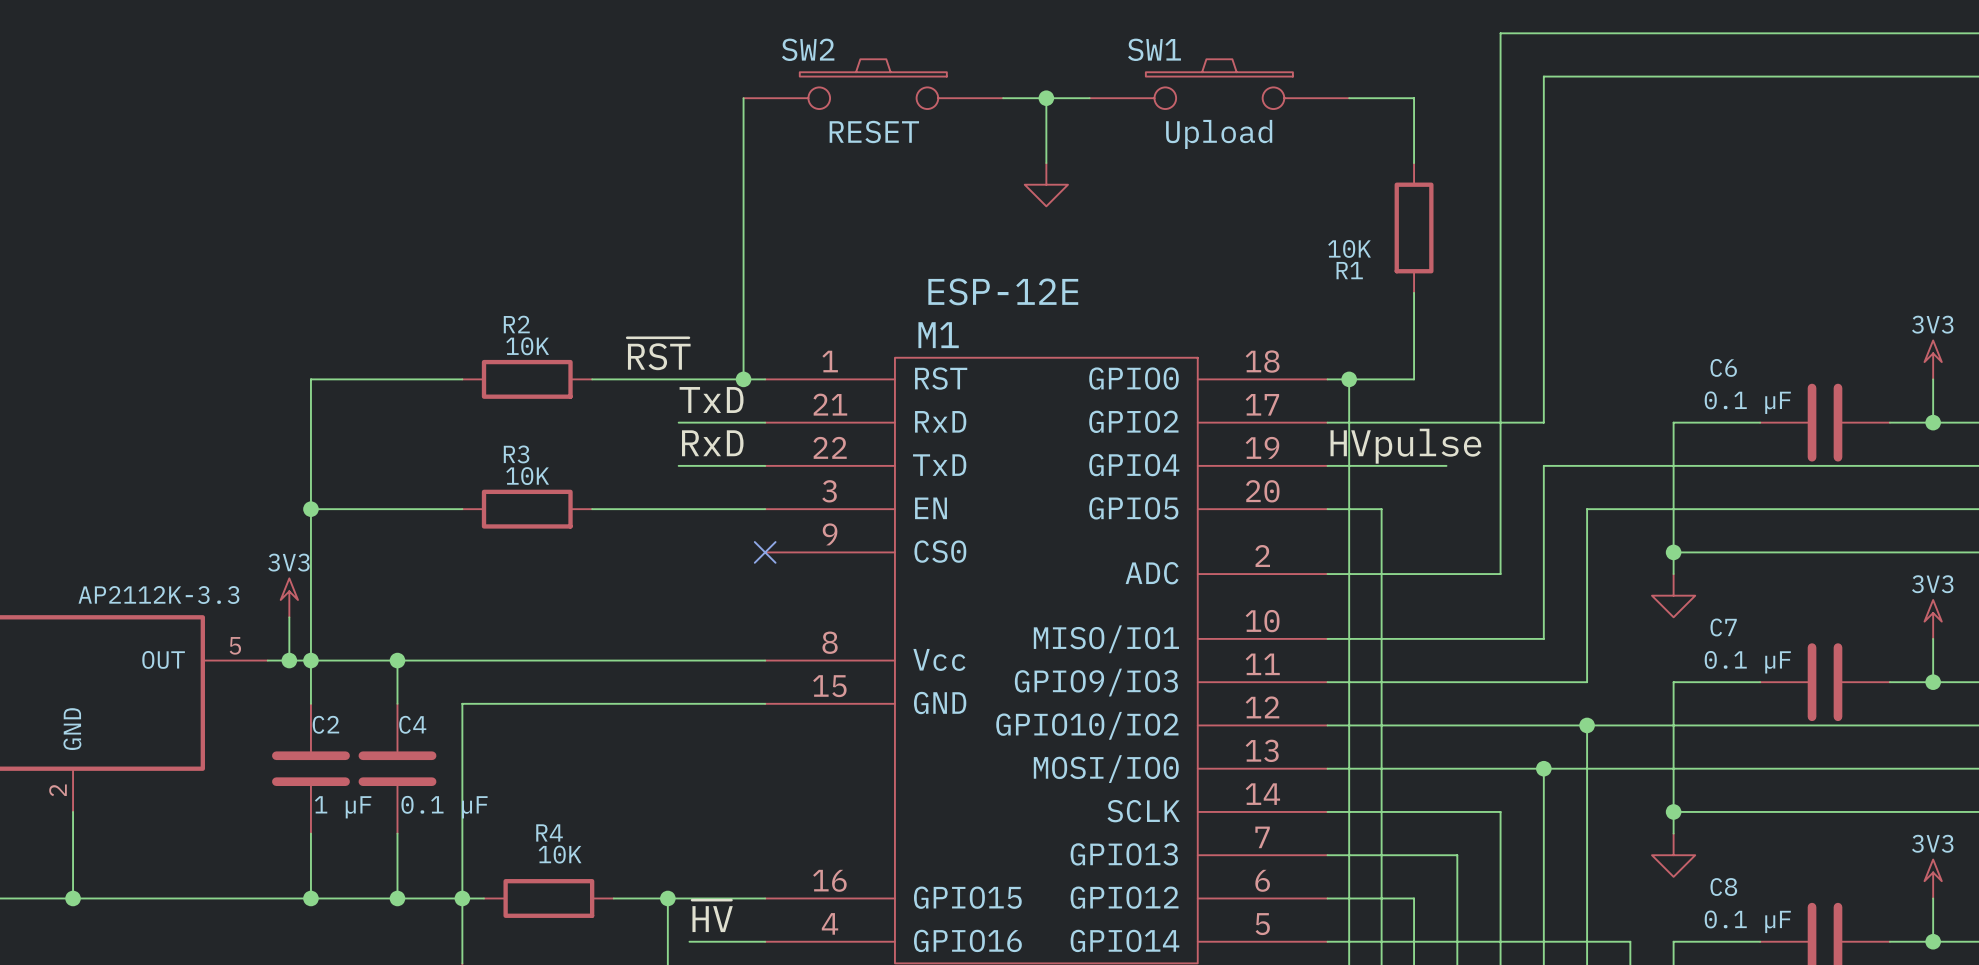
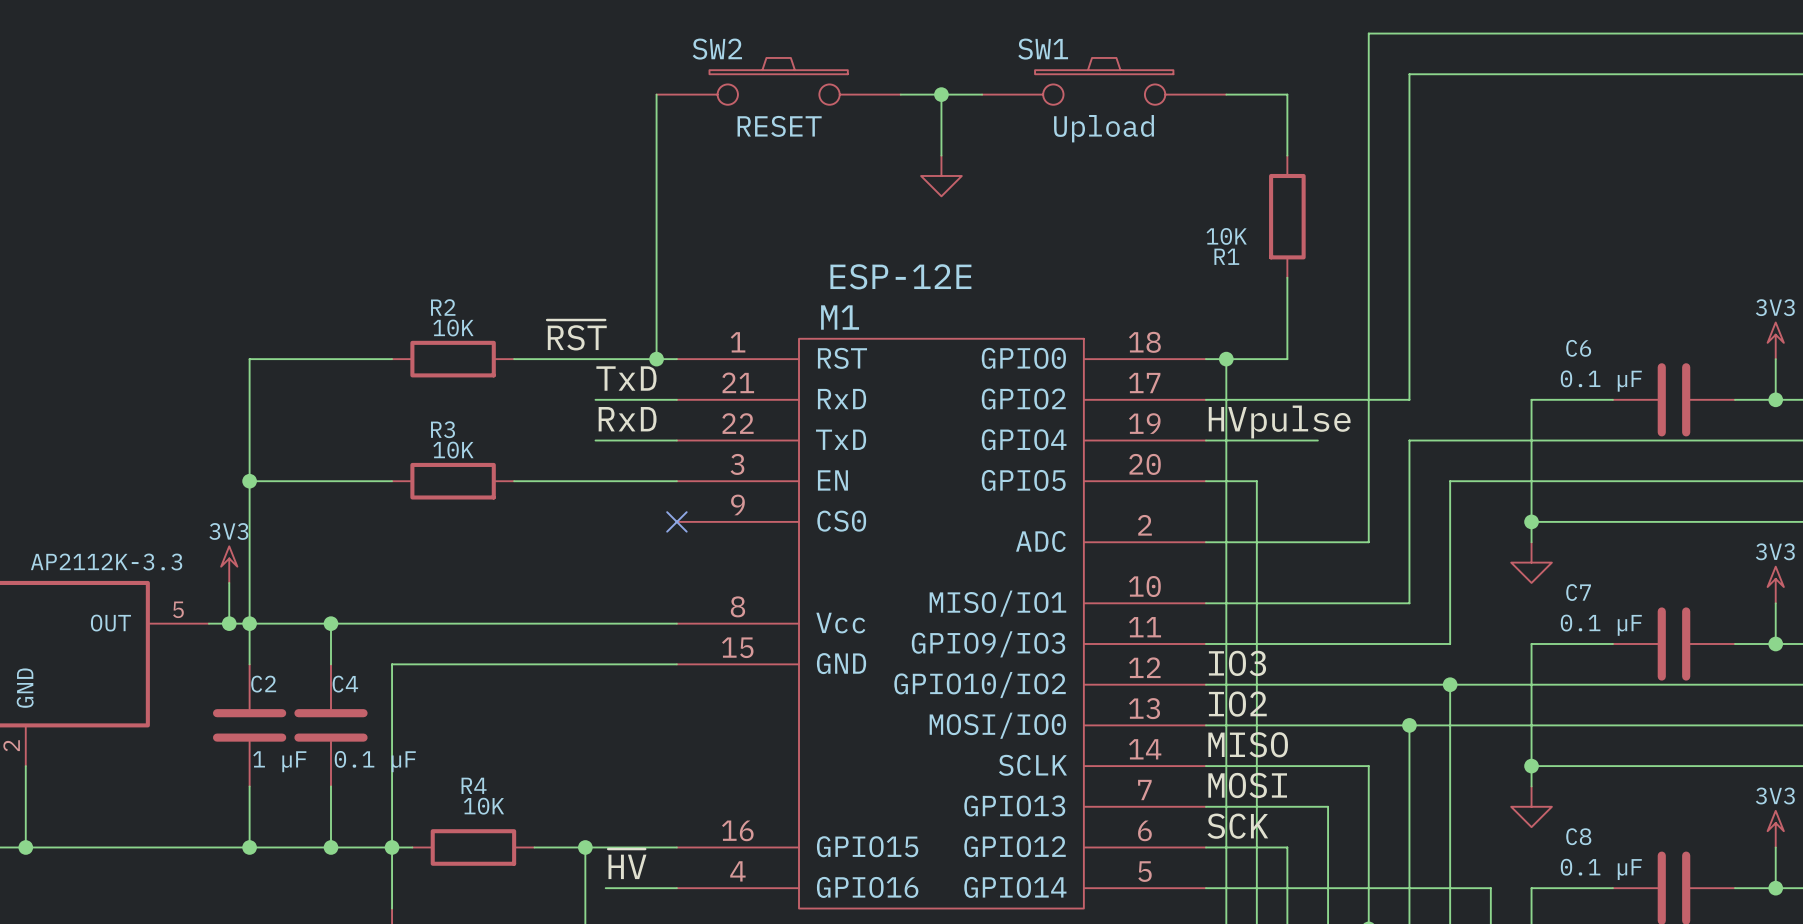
label: none -> IO3 (1237, 663)
label: none -> IO2 (1237, 704)
label: none -> MISO (1248, 744)
label: none -> MOSI (1247, 785)
label: none -> SCK (1237, 826)

